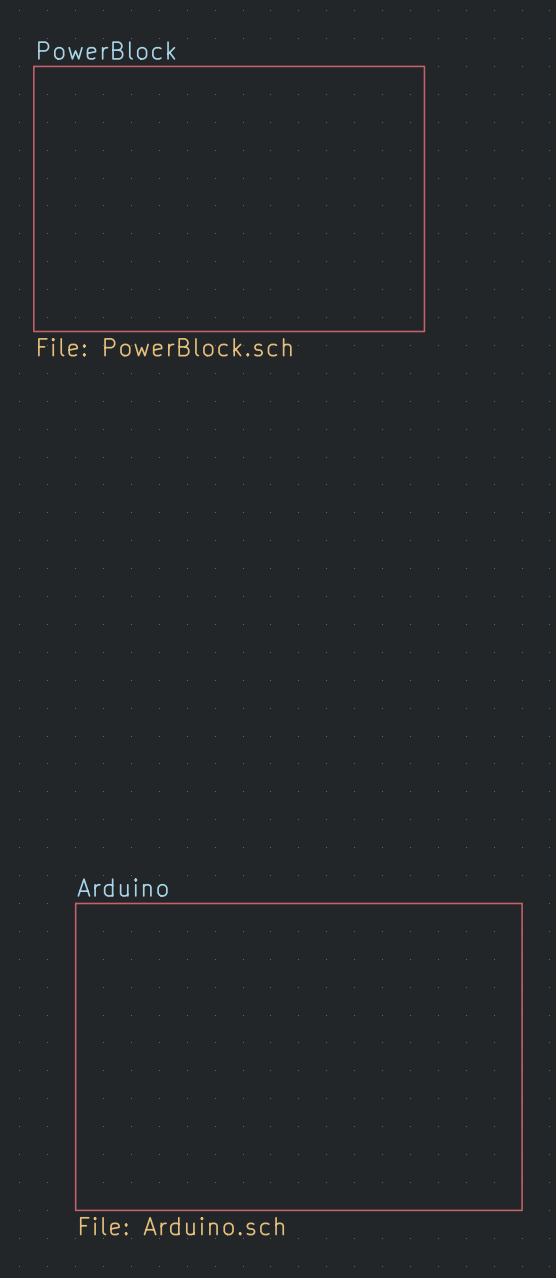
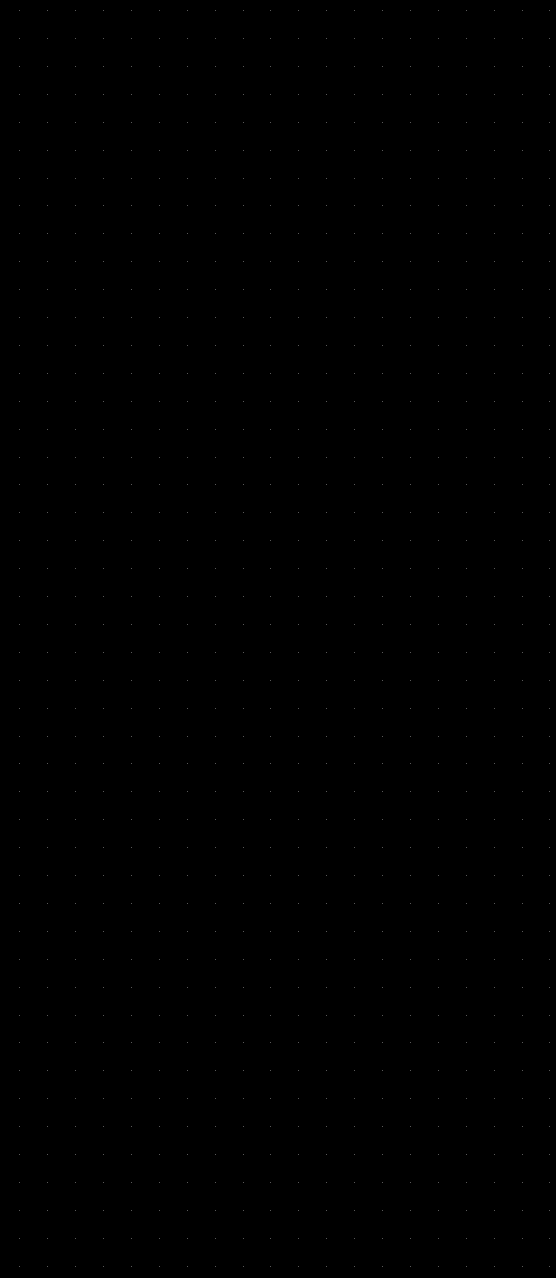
sheet PowerBlock: File: PowerBlock.sch (229, 198) -> none
sheet Arduino: File: Arduino.sch (298, 1056) -> none

